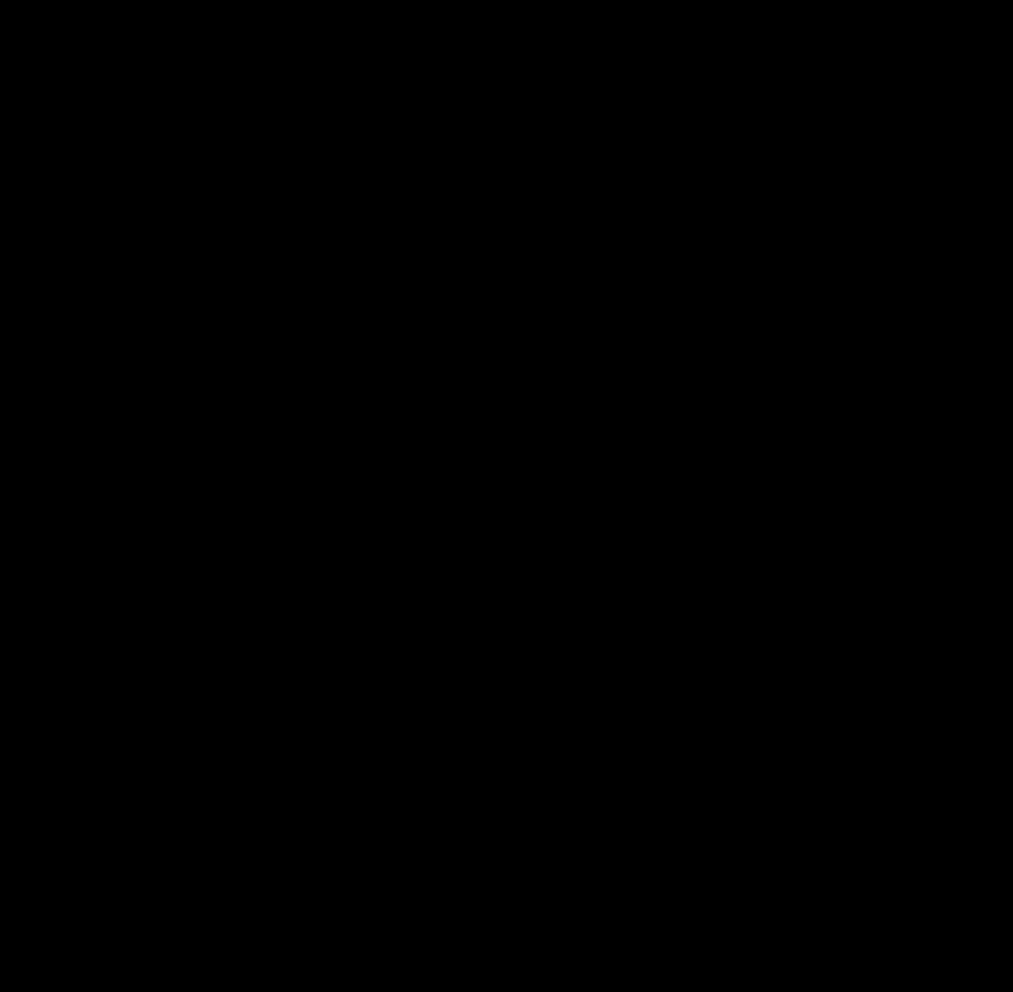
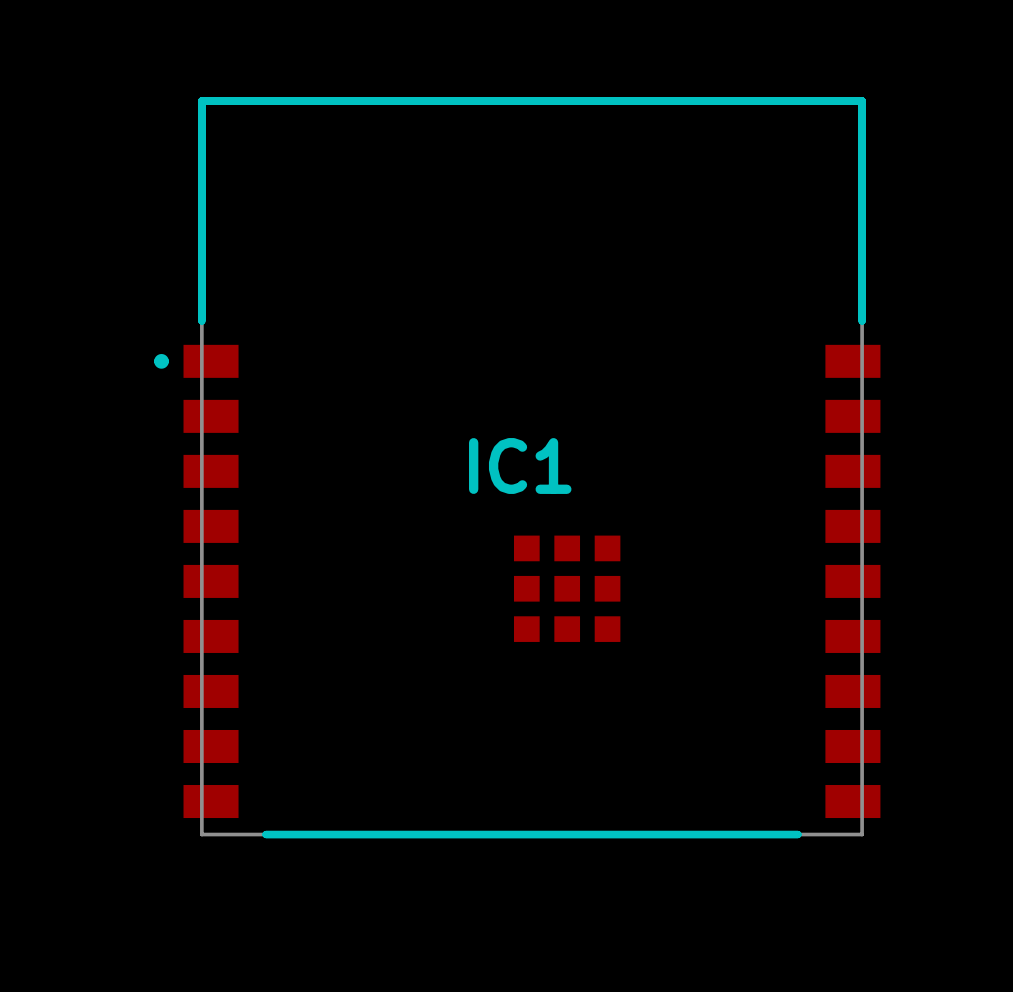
IC1: none -> (517, 467)

